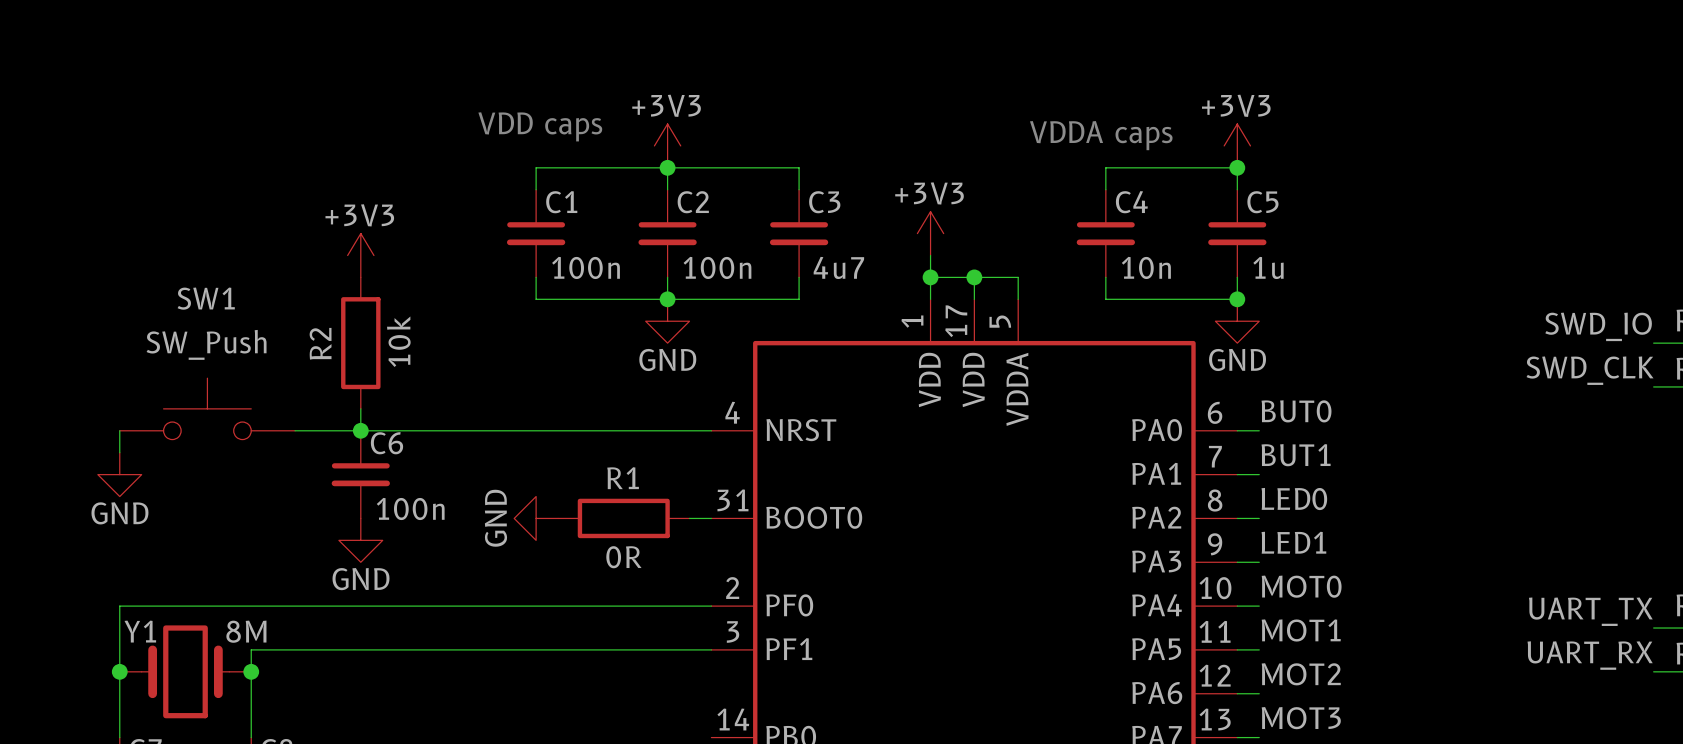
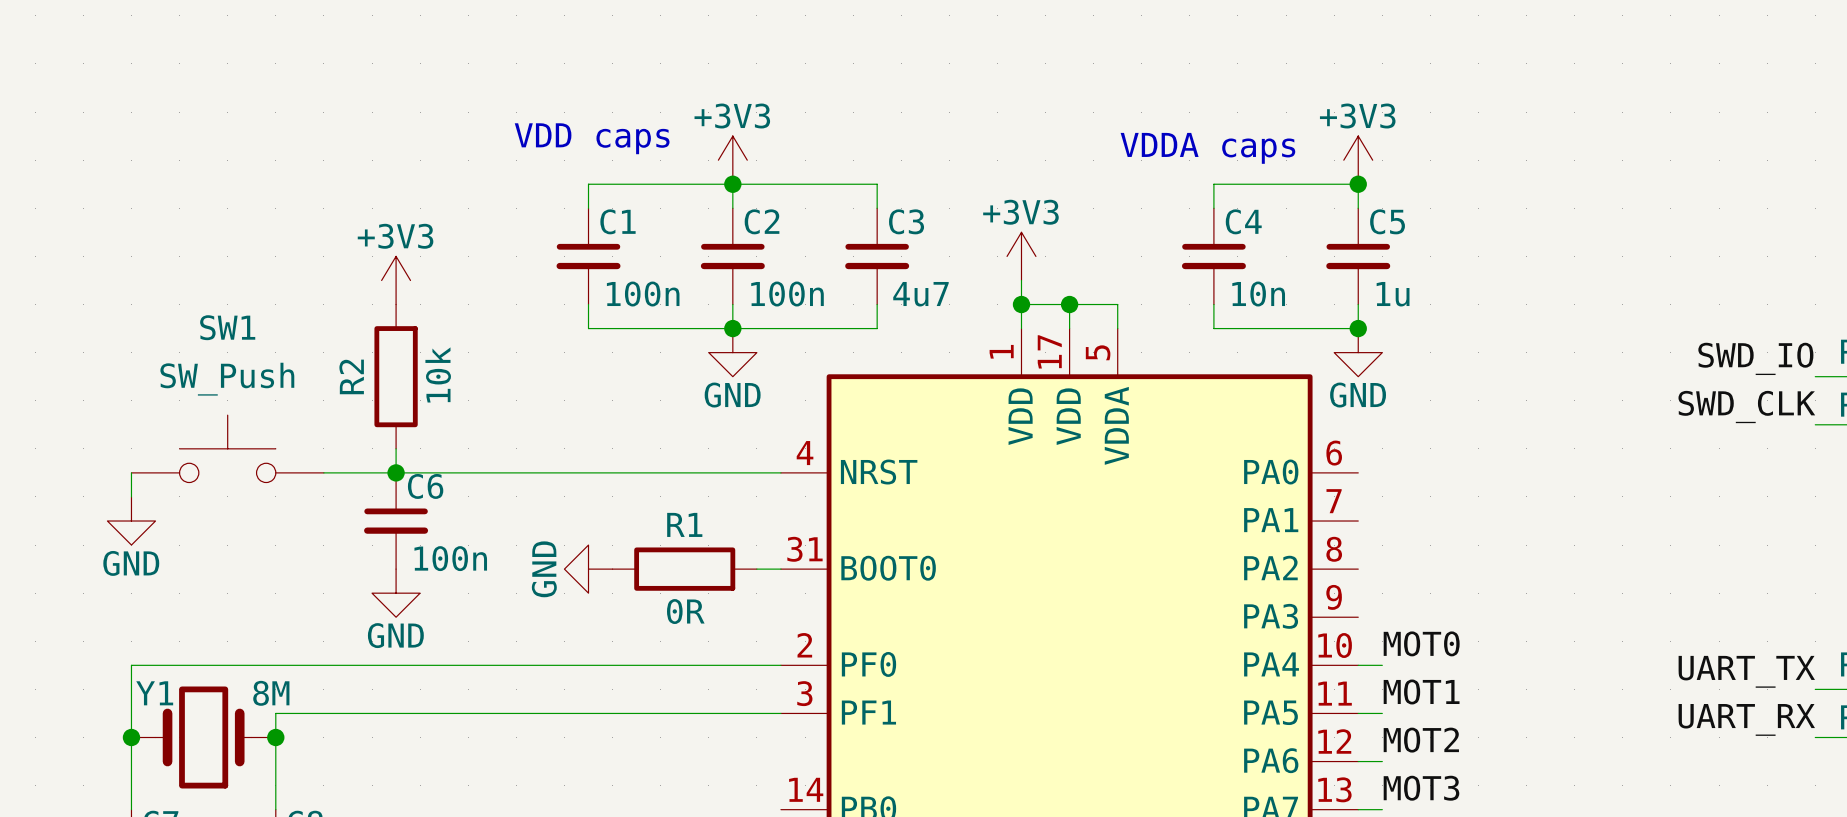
label: BUT0 (1296, 411) -> none
wire: (1237, 430) (1259, 430) -> none
label: BUT1 (1296, 455) -> none
wire: (1237, 474) (1259, 474) -> none
label: LED0 (1294, 499) -> none
wire: (1237, 518) (1259, 518) -> none
label: LED1 (1293, 542) -> none
wire: (1237, 562) (1259, 562) -> none

